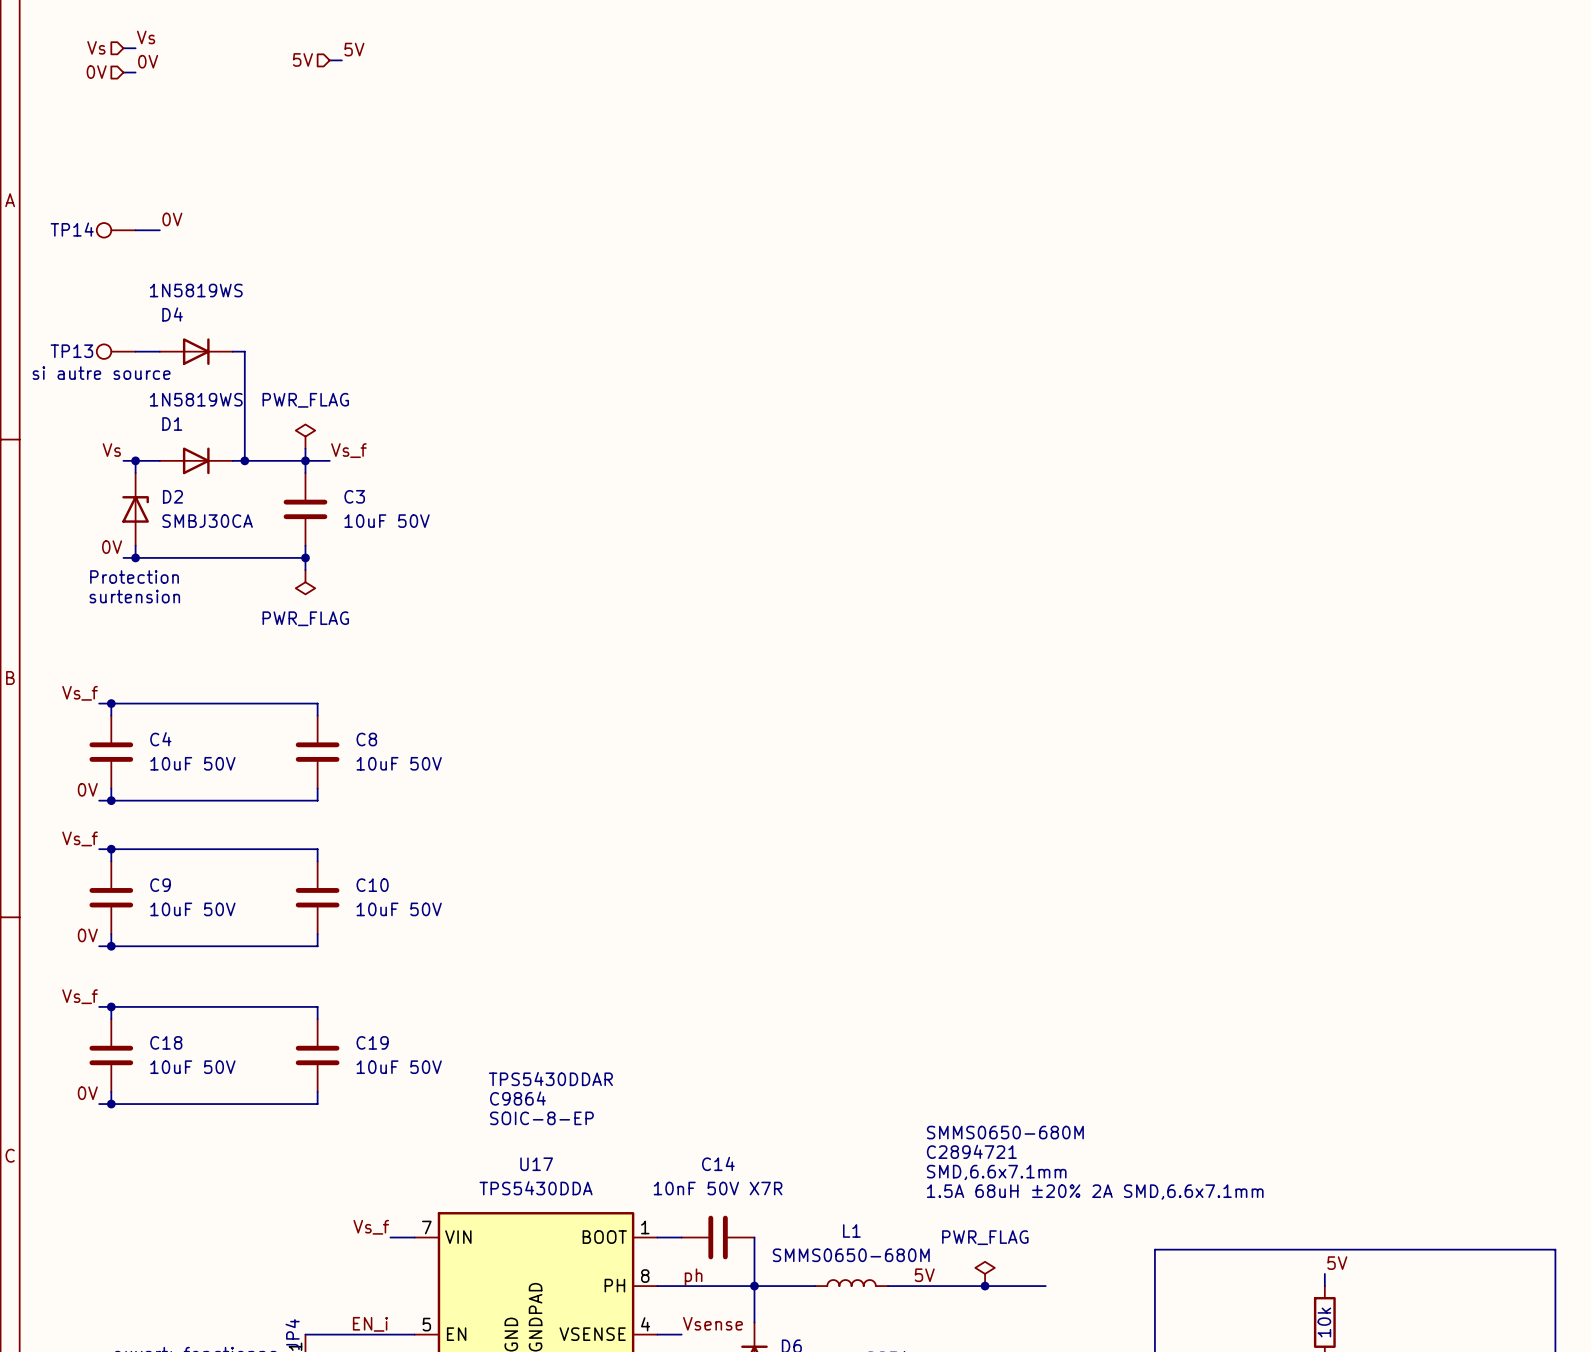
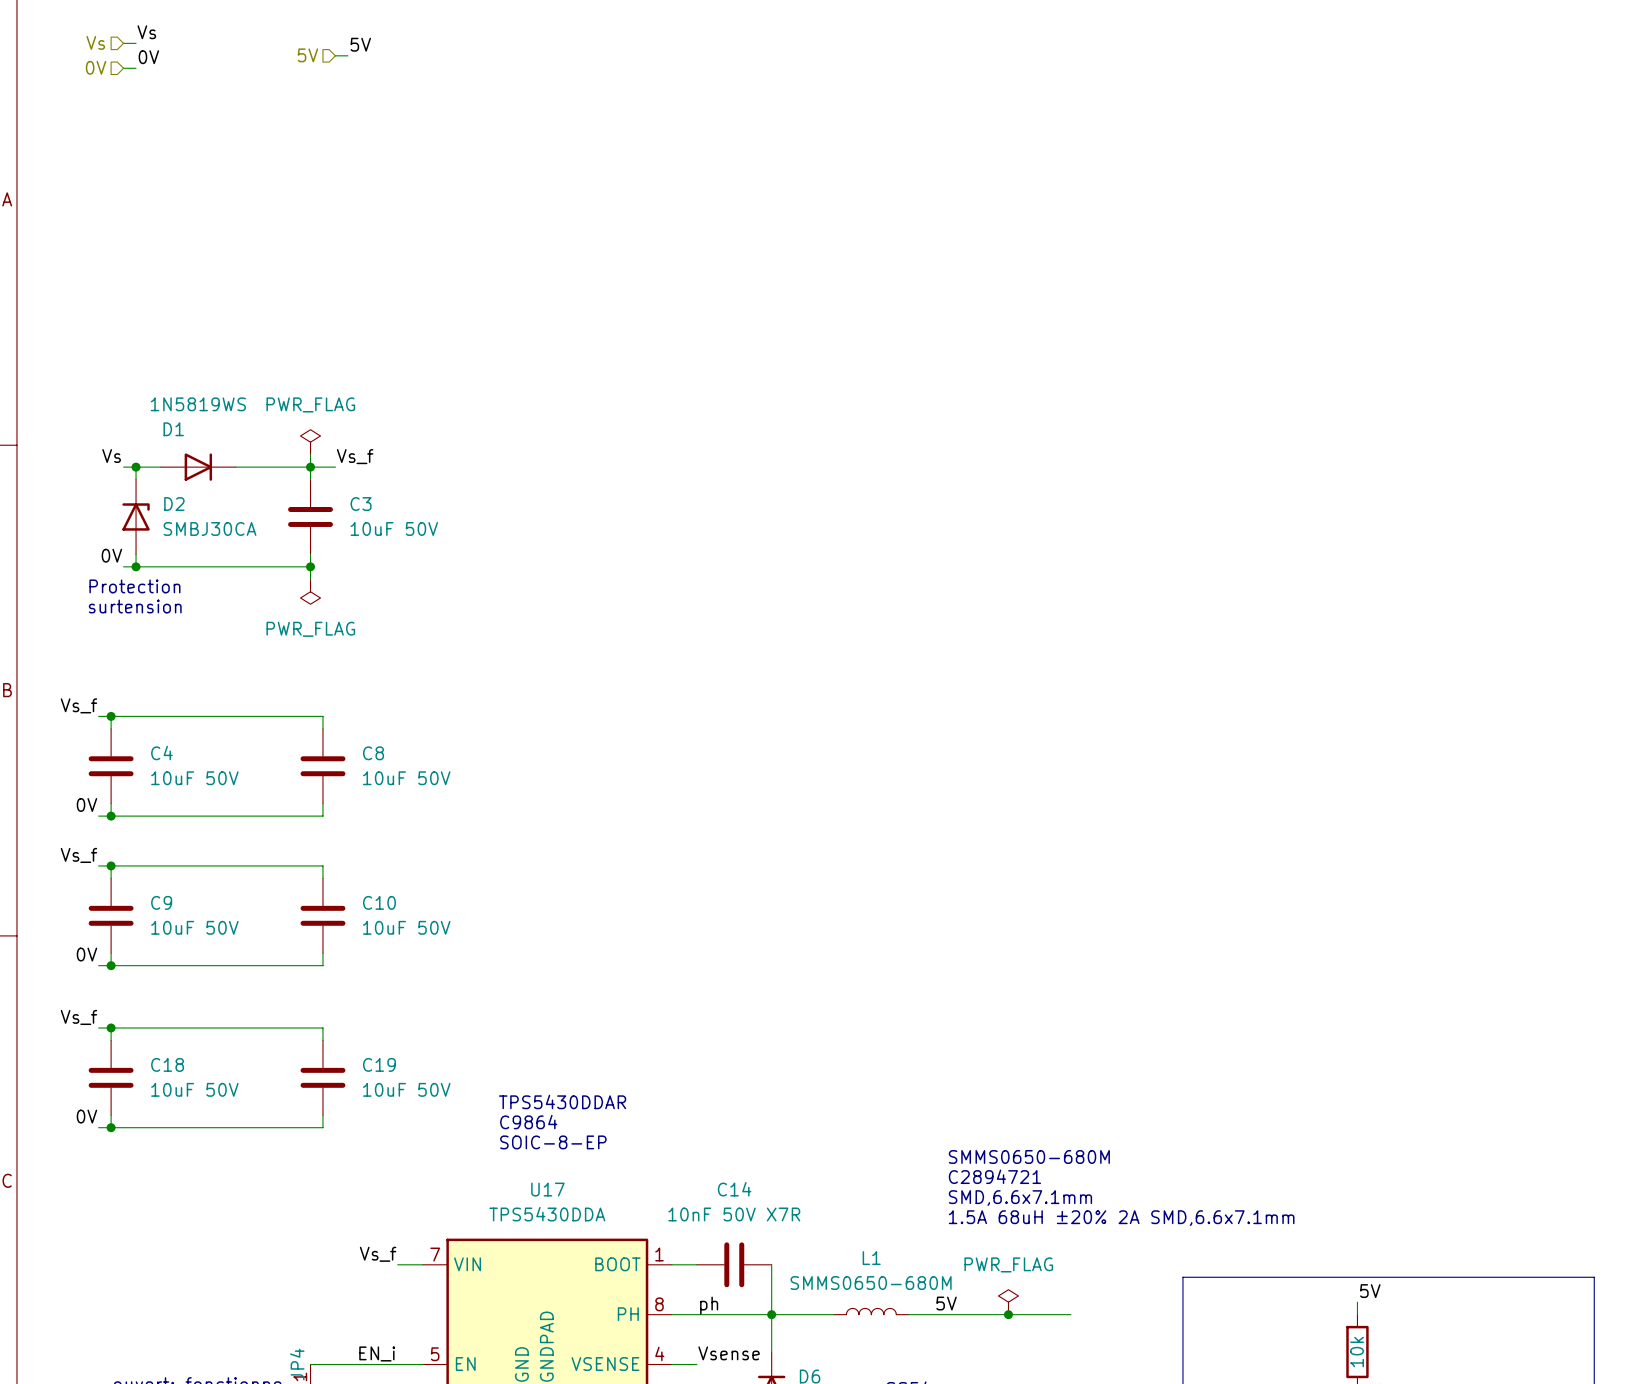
label: 0V (172, 219) -> none
TP14: (116, 230) -> none
wire: (135, 230) (159, 230) -> none
TP13: (116, 351) -> none
wire: (135, 351) (159, 351) -> none
D4: 1N5819WS (196, 351) -> none
wire: (232, 351) (244, 351) (244, 460) -> none
text: si autre source (101, 373) -> none
junction: (244, 460) -> none

